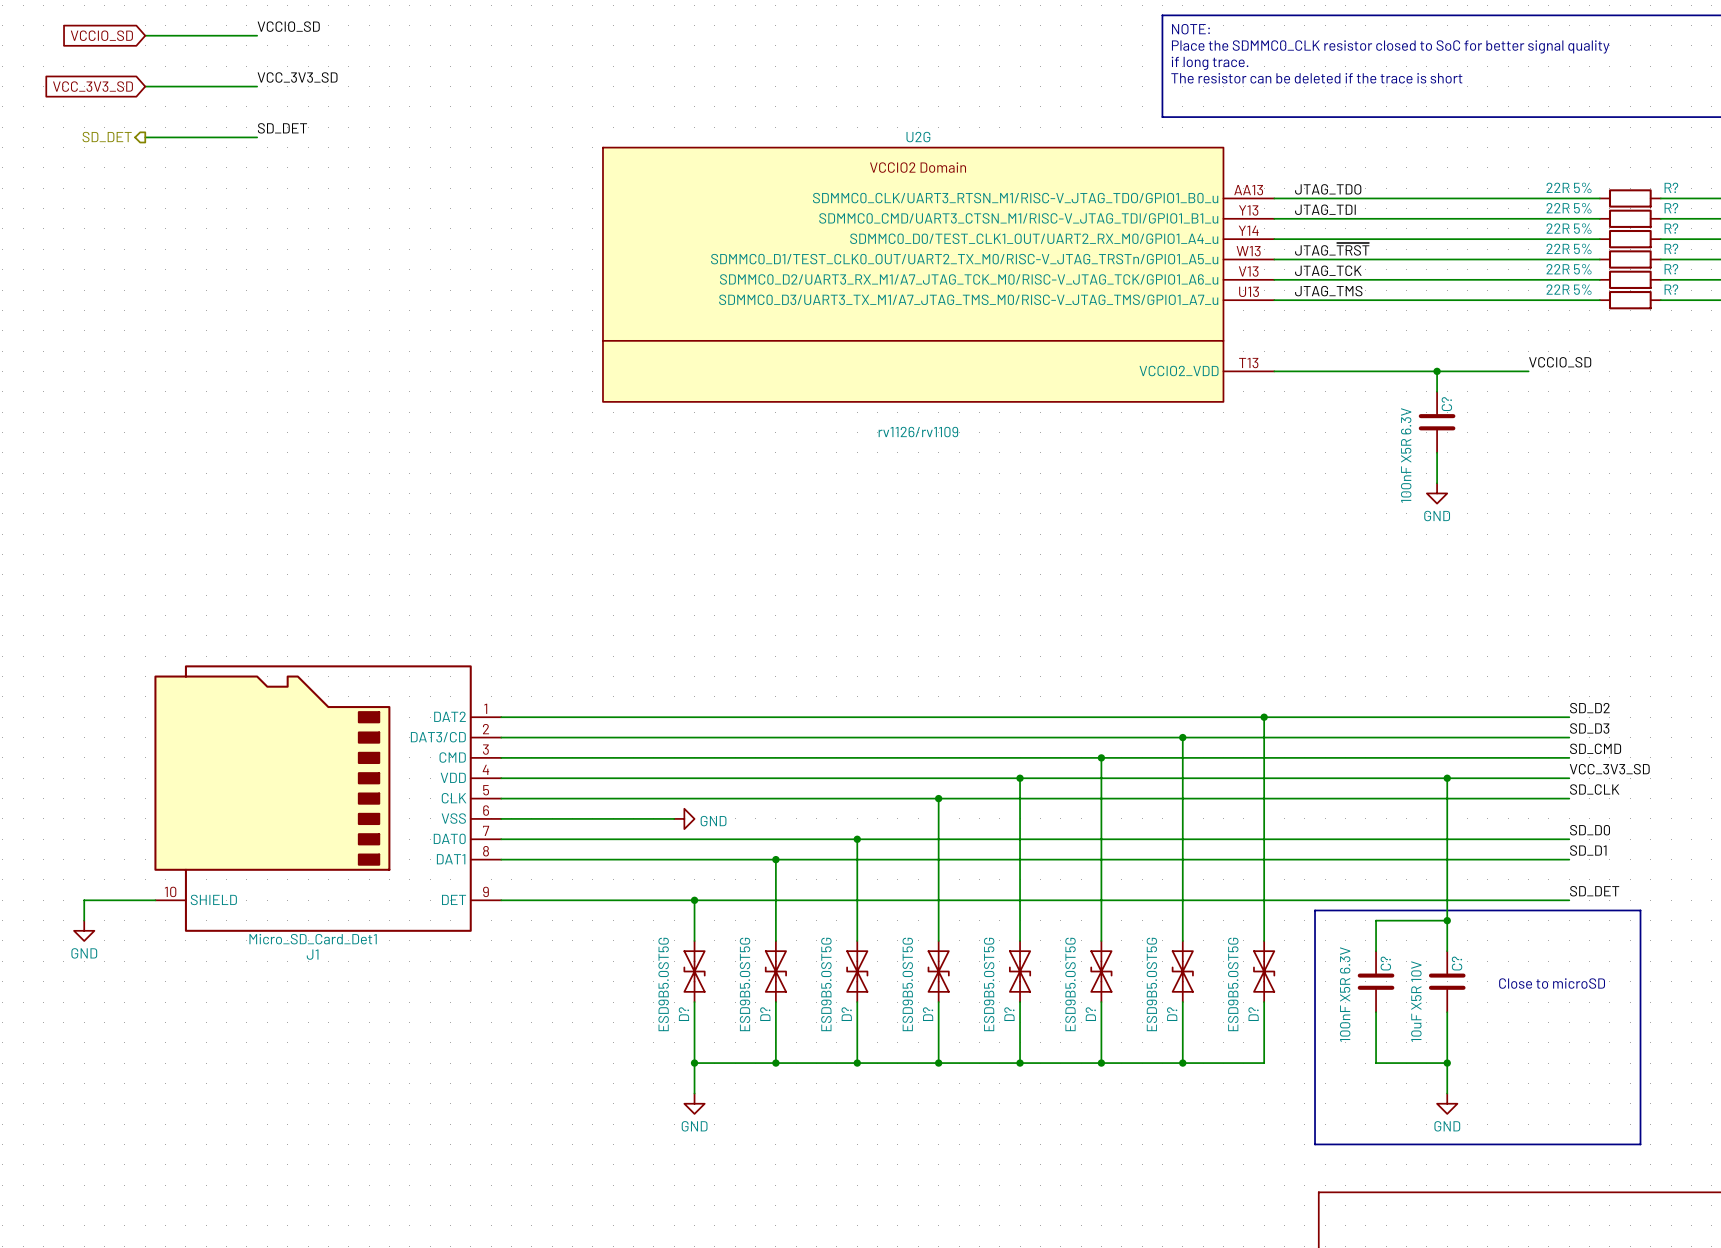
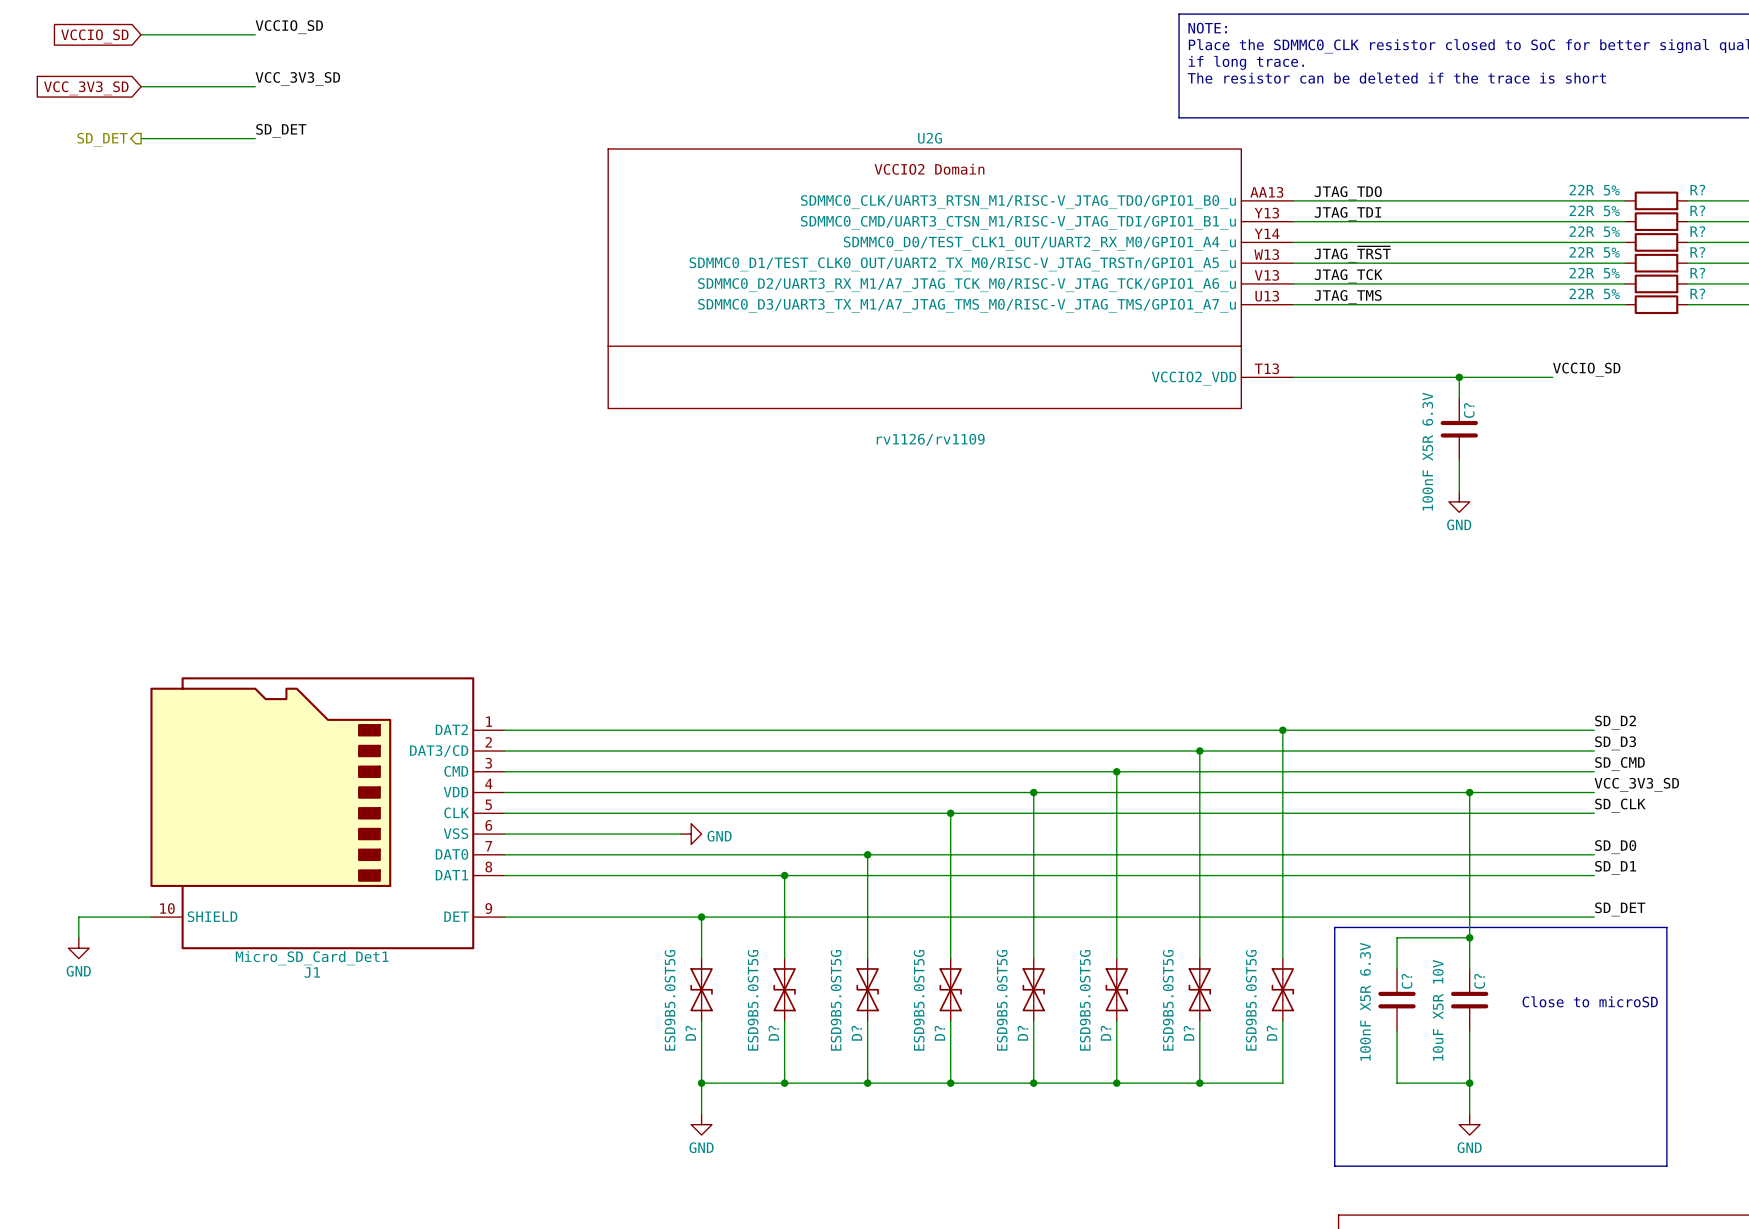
U2G symbol: [602, 147, 1275, 402] -> [608, 149, 1294, 409]

